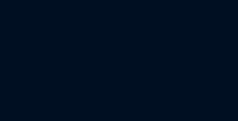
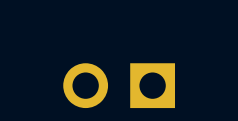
part: none -> (119, 85)

